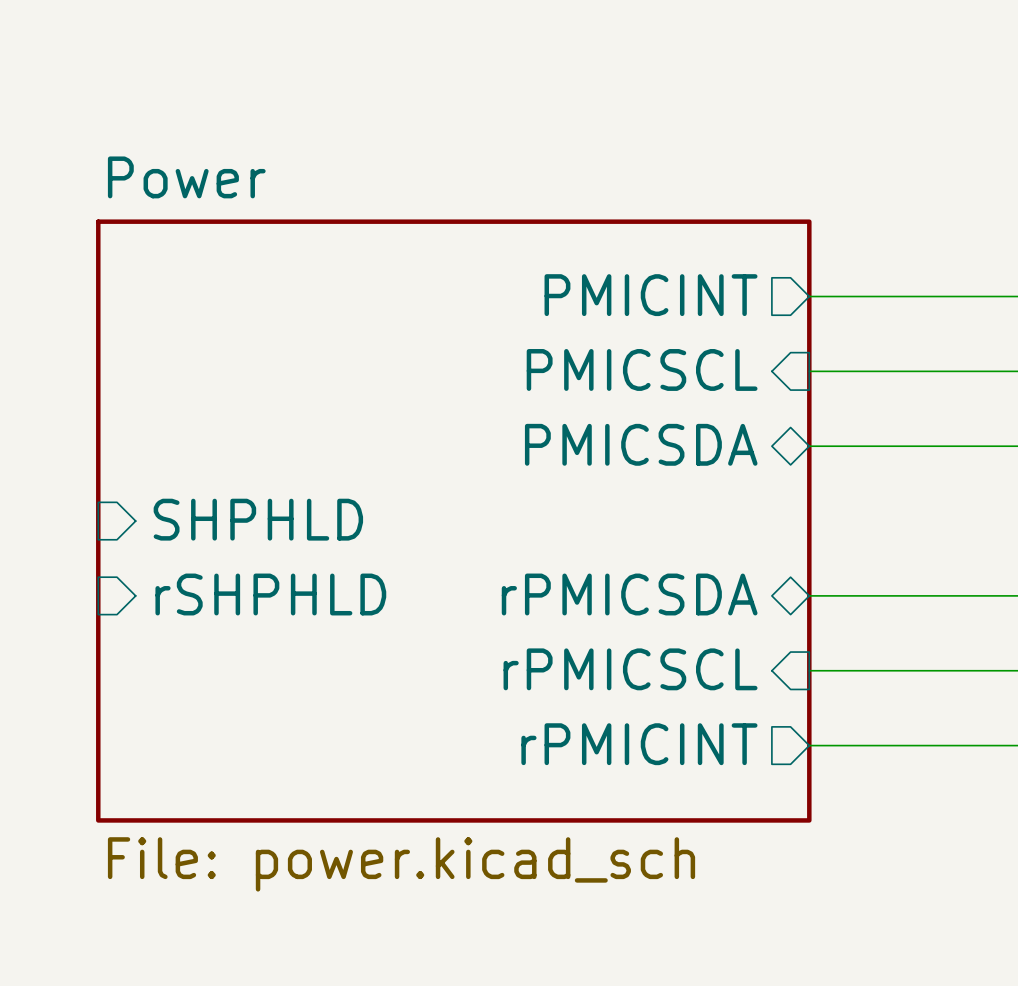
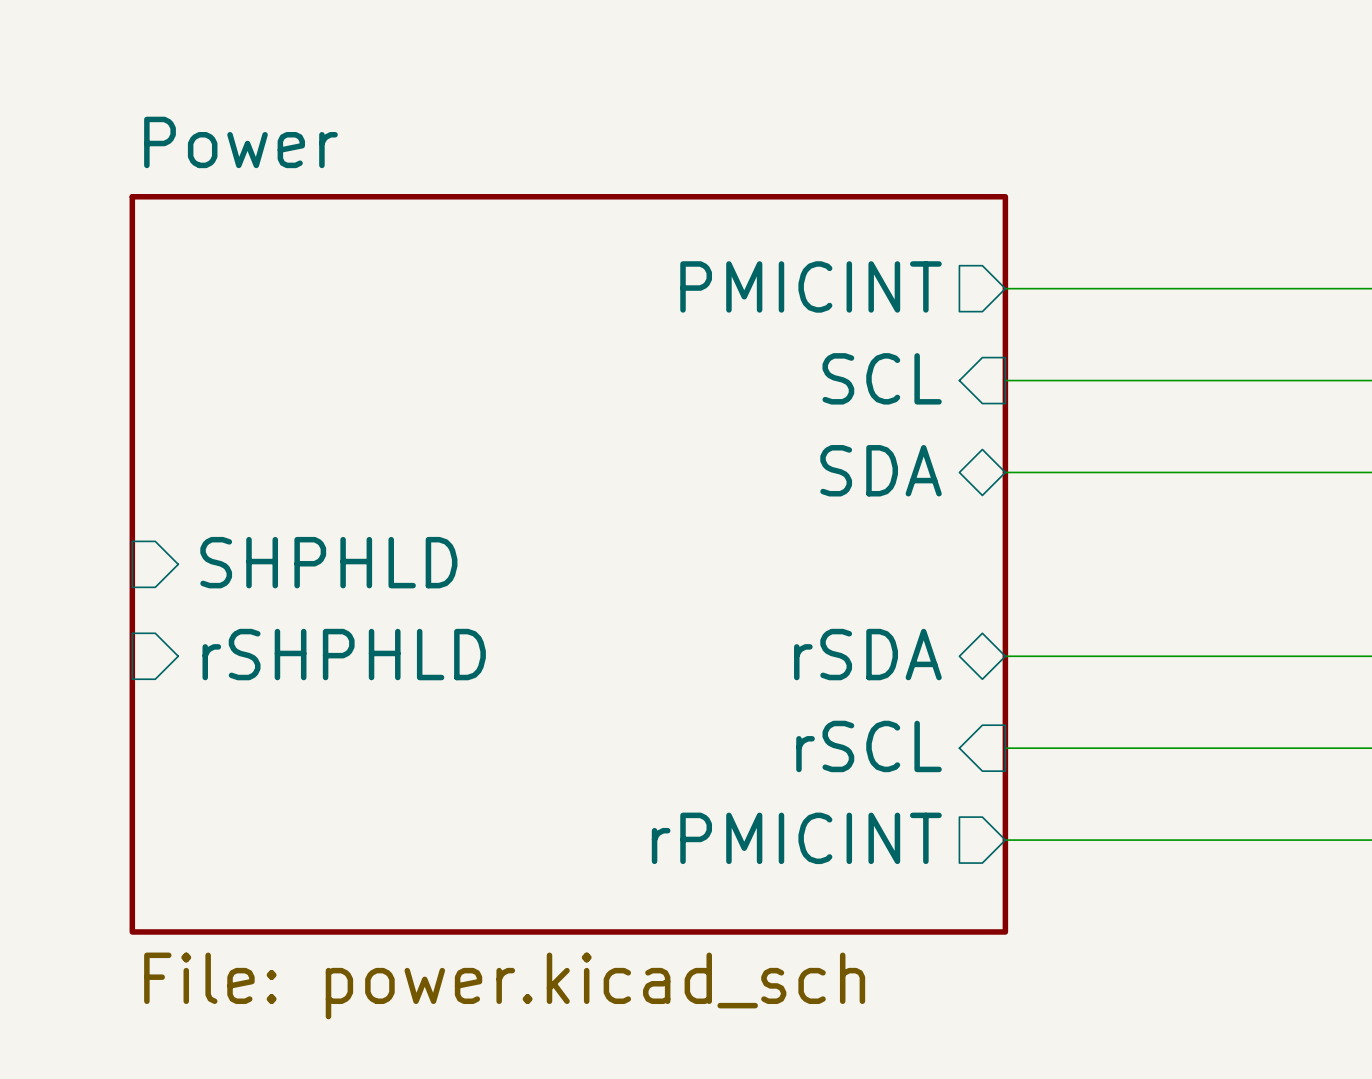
sheet pin: PMICSCL (642, 369) -> SCL (882, 378)
sheet pin: PMICSDA (641, 444) -> SDA (881, 470)
sheet pin: rPMICSDA (629, 594) -> rSDA (867, 654)
sheet pin: rPMICSCL (630, 669) -> rSCL (868, 746)

